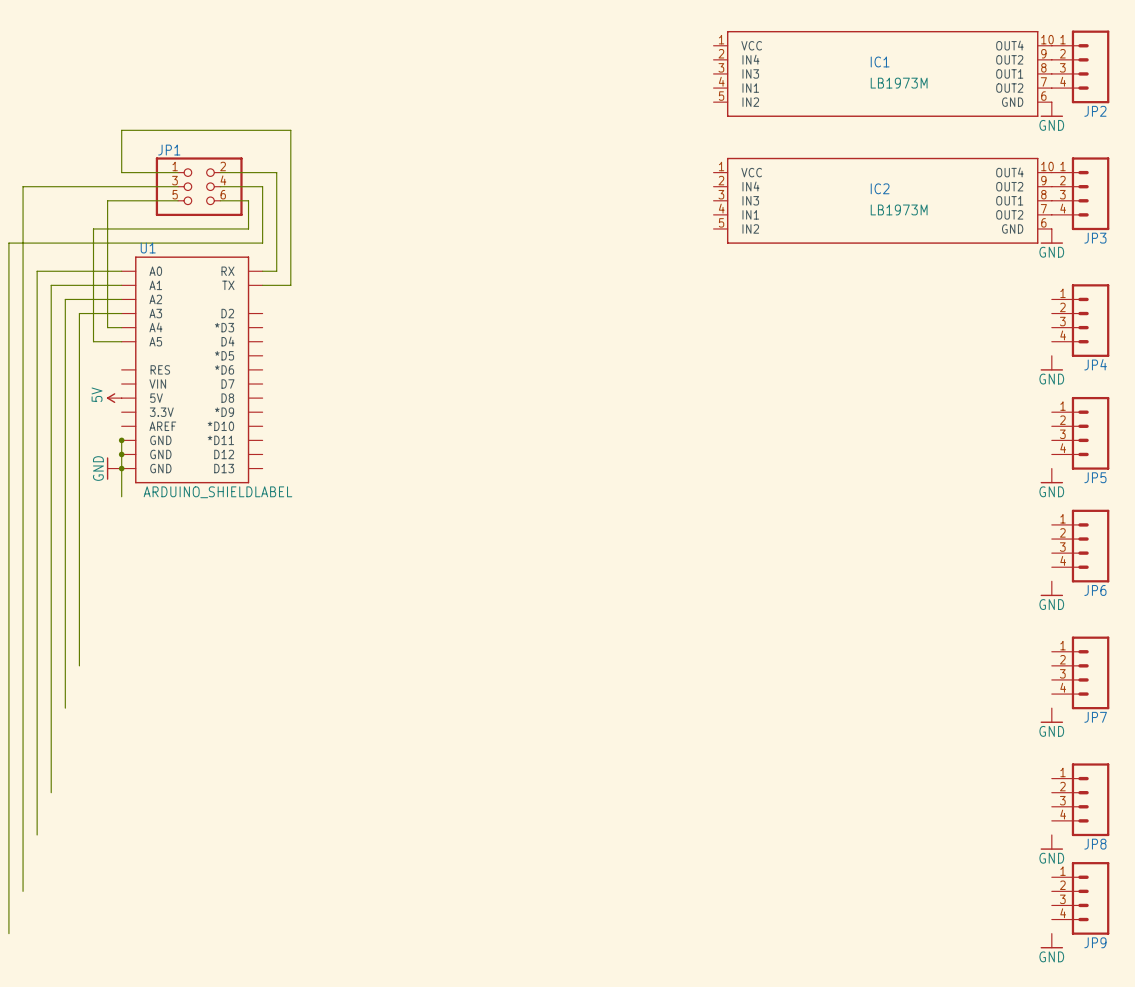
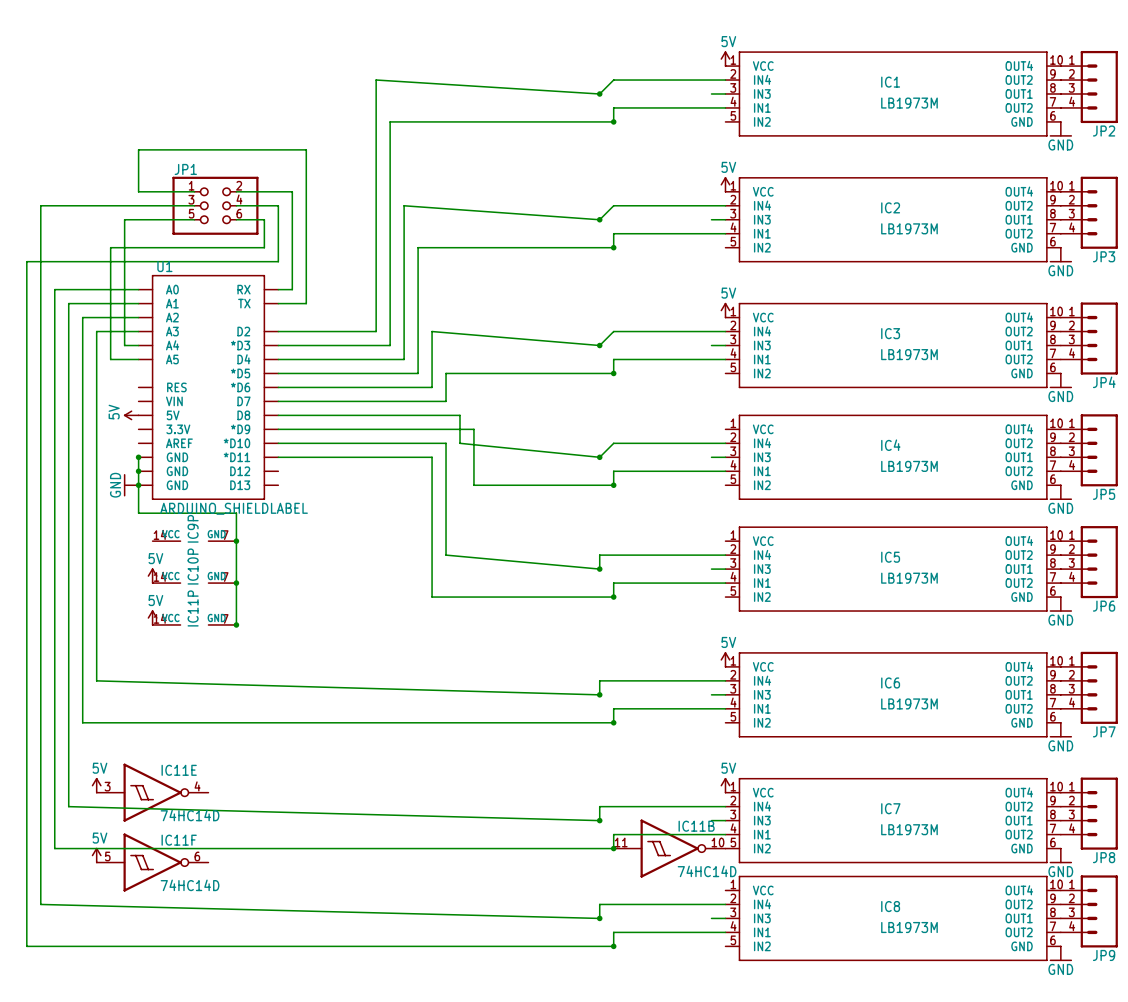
power symbol: none -> 5V (725, 58)
wire: none -> (725, 80) (613, 80) (599, 93) (376, 80) (376, 331) (278, 331)
junction: none -> (599, 93)
wire: none -> (711, 93) (725, 93)
wire: none -> (725, 107) (613, 107) (613, 121) (390, 121) (390, 345) (278, 345)
junction: none -> (613, 121)
power symbol: none -> 5V (725, 184)
wire: none -> (725, 205) (613, 205) (599, 219) (404, 205) (404, 359) (278, 359)
junction: none -> (599, 219)
wire: none -> (711, 219) (725, 219)
wire: none -> (725, 233) (613, 233) (613, 247) (418, 247) (418, 373) (278, 373)
junction: none -> (613, 247)
power symbol: none -> 5V (725, 310)
wire: none -> (725, 331) (613, 331) (599, 345) (432, 331) (432, 387) (278, 387)
junction: none -> (599, 345)
wire: none -> (711, 345) (725, 345)
IC3: none -> LB1973M (893, 345)
wire: none -> (725, 359) (613, 359) (613, 373) (446, 373) (446, 401) (278, 401)
junction: none -> (613, 373)
wire: none -> (278, 415) (459, 415) (459, 443) (599, 457) (613, 443) (725, 443)
wire: none -> (278, 429) (473, 429) (473, 485) (613, 485) (613, 471) (725, 471)
wire: none -> (278, 443) (446, 443) (446, 555) (599, 569) (599, 555) (725, 555)
wire: none -> (278, 457) (432, 457) (432, 597) (613, 597) (613, 583) (725, 583)
junction: none -> (599, 457)
wire: none -> (711, 457) (725, 457)
IC4: none -> LB1973M (893, 457)
junction: none -> (613, 485)
wire: none -> (138, 513) (236, 513) (236, 624)
IC9P: none -> (194, 541)
junction: none -> (236, 541)
junction: none -> (599, 569)
wire: none -> (711, 569) (725, 569)
IC5: none -> LB1973M (893, 569)
power symbol: none -> 5V (152, 575)
IC10P: none -> (194, 583)
junction: none -> (236, 583)
junction: none -> (613, 597)
power symbol: none -> 5V (152, 617)
IC11P: none -> (194, 624)
junction: none -> (236, 624)
power symbol: none -> 5V (725, 659)
wire: none -> (96, 680) (599, 694) (599, 680) (725, 680)
junction: none -> (599, 694)
wire: none -> (711, 694) (725, 694)
IC6: none -> LB1973M (893, 694)
wire: none -> (725, 708) (613, 708) (613, 722) (82, 722)
junction: none -> (613, 722)
power symbol: none -> 5V (96, 785)
power symbol: none -> 5V (725, 785)
IC11E: none -> 74HC14D (152, 792)
wire: none -> (68, 806) (599, 820) (599, 806) (725, 806)
junction: none -> (599, 820)
wire: none -> (711, 820) (725, 820)
IC7: none -> LB1973M (893, 820)
wire: none -> (725, 834) (613, 834) (613, 848) (54, 848)
junction: none -> (613, 848)
IC11B: none -> 74HC14D (669, 848)
power symbol: none -> 5V (96, 855)
IC11F: none -> 74HC14D (152, 862)
wire: none -> (40, 904) (599, 918) (599, 904) (725, 904)
junction: none -> (599, 918)
wire: none -> (711, 918) (725, 918)
IC8: none -> LB1973M (893, 918)
wire: none -> (725, 932) (613, 932) (613, 946) (26, 946)
junction: none -> (613, 946)

